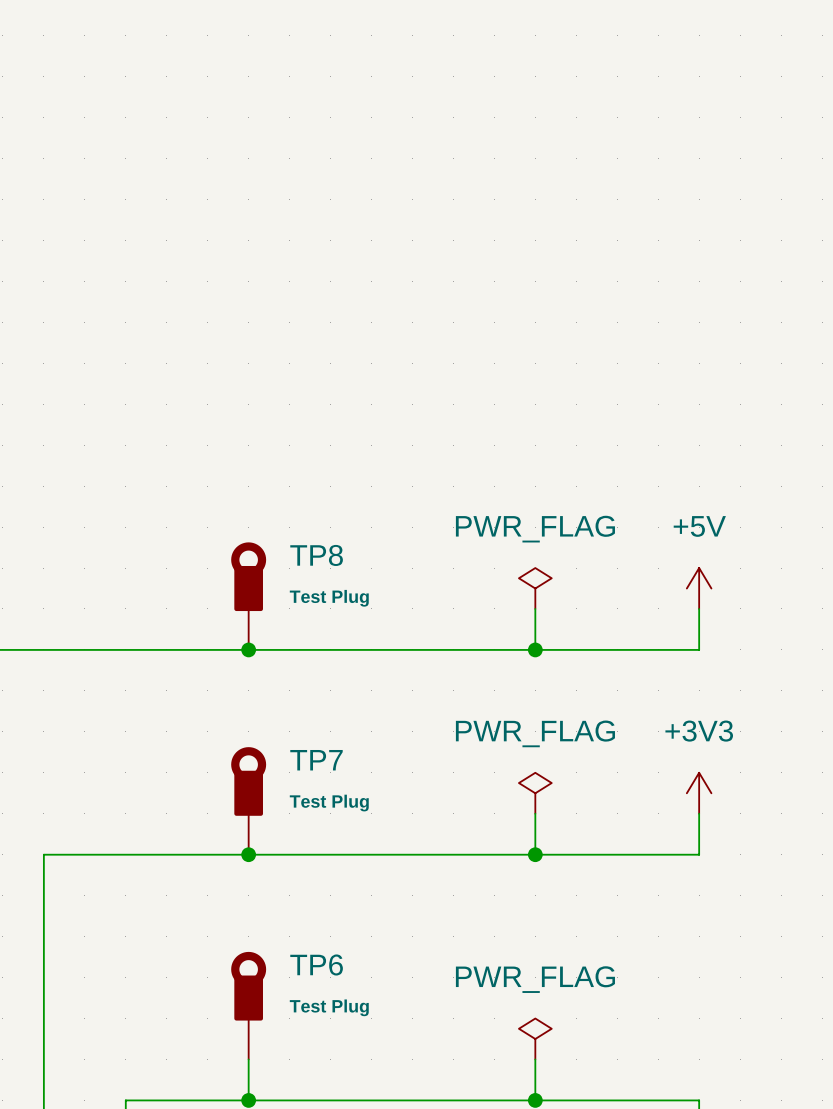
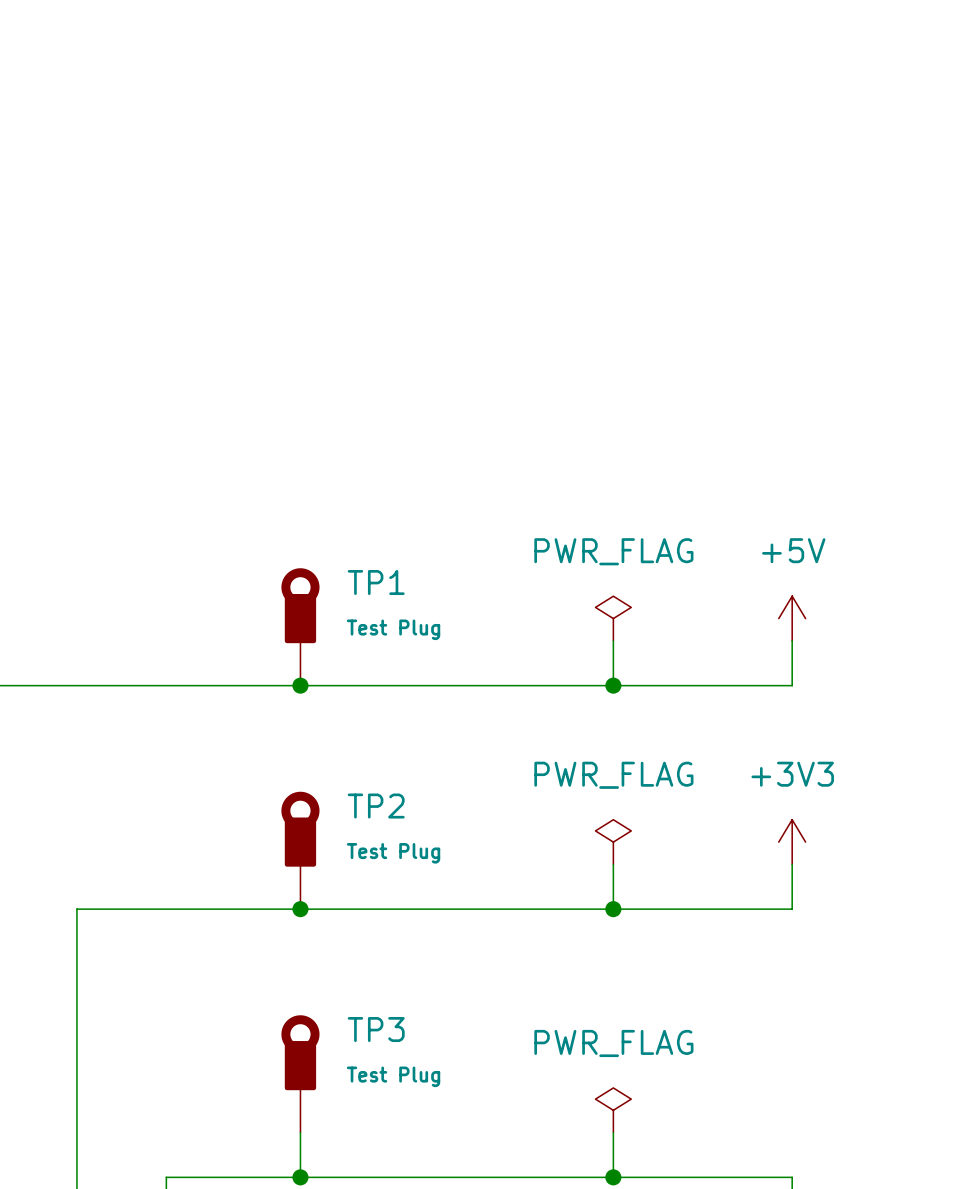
TP8 name: TP8 (316, 555) -> TP1 (376, 582)
TP7 name: TP7 (316, 760) -> TP2 (376, 806)
TP6 name: TP6 (316, 964) -> TP3 (376, 1029)

